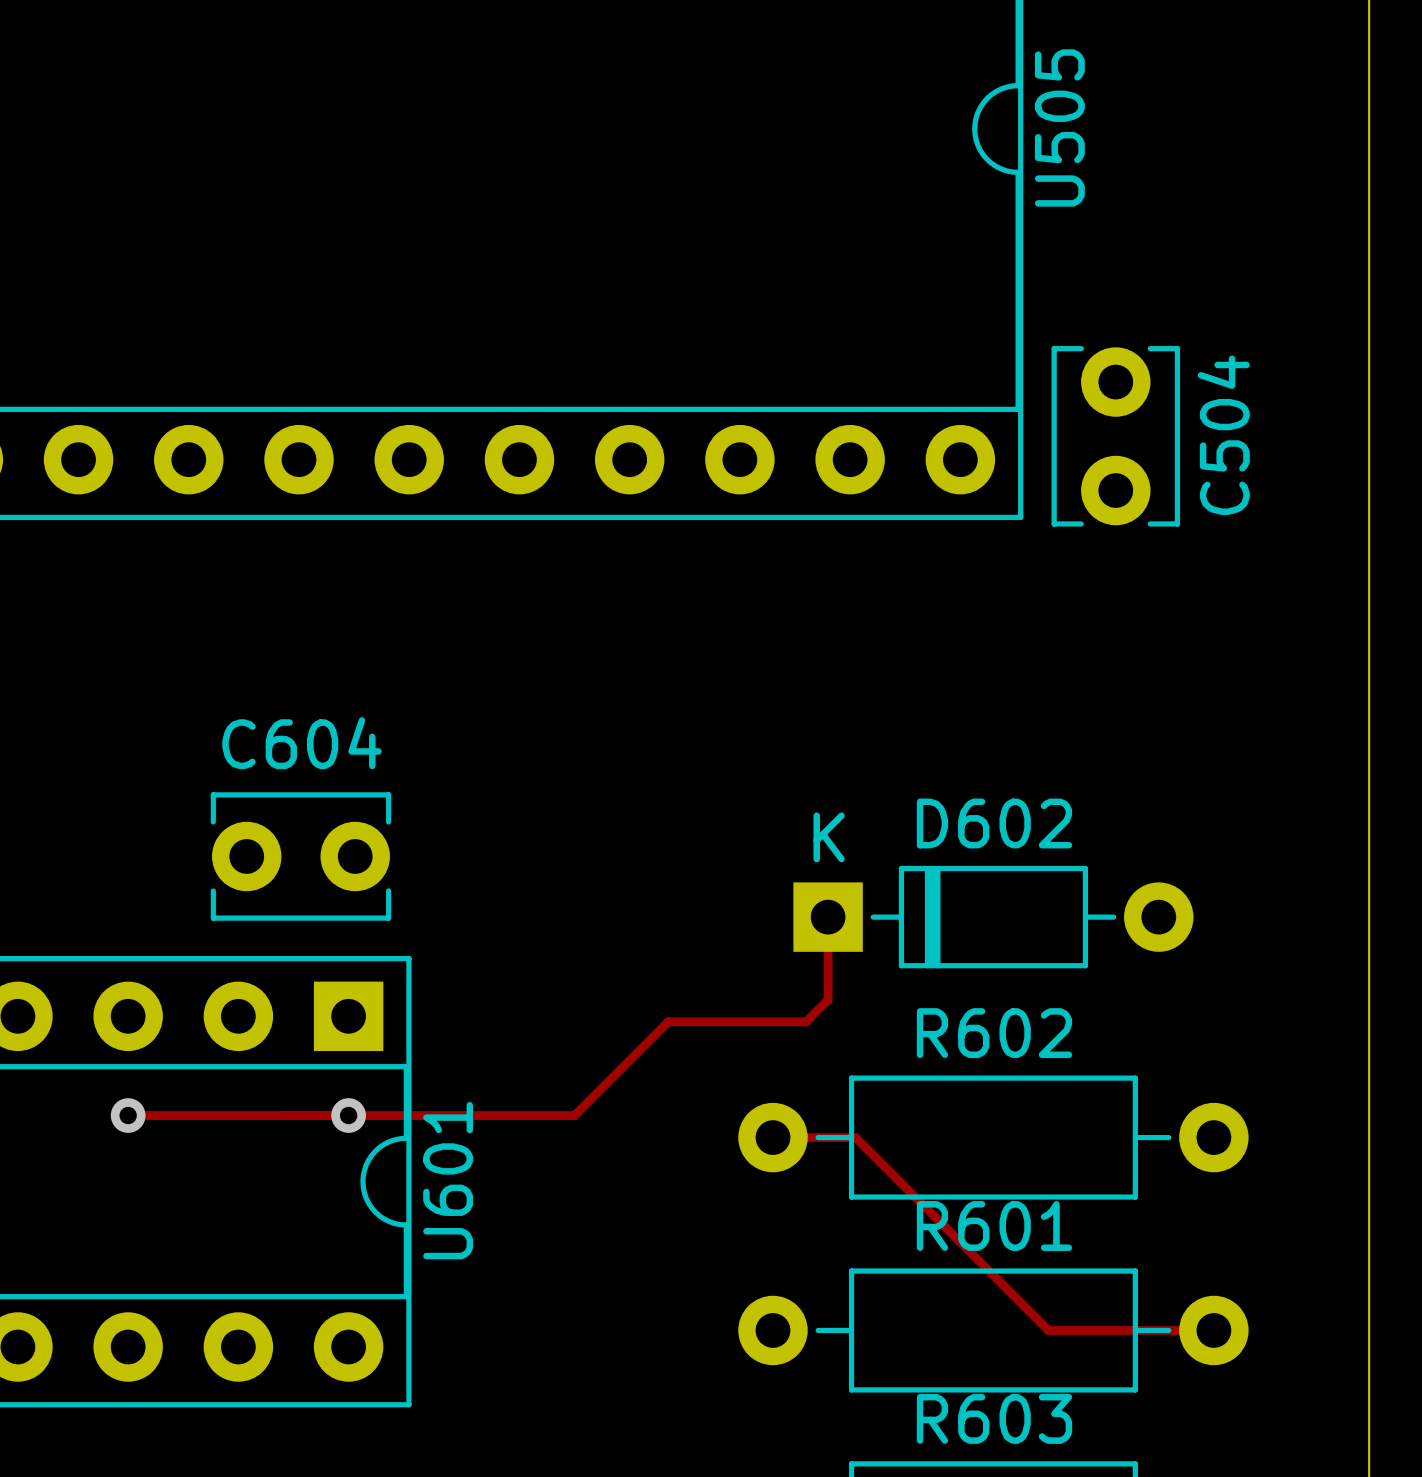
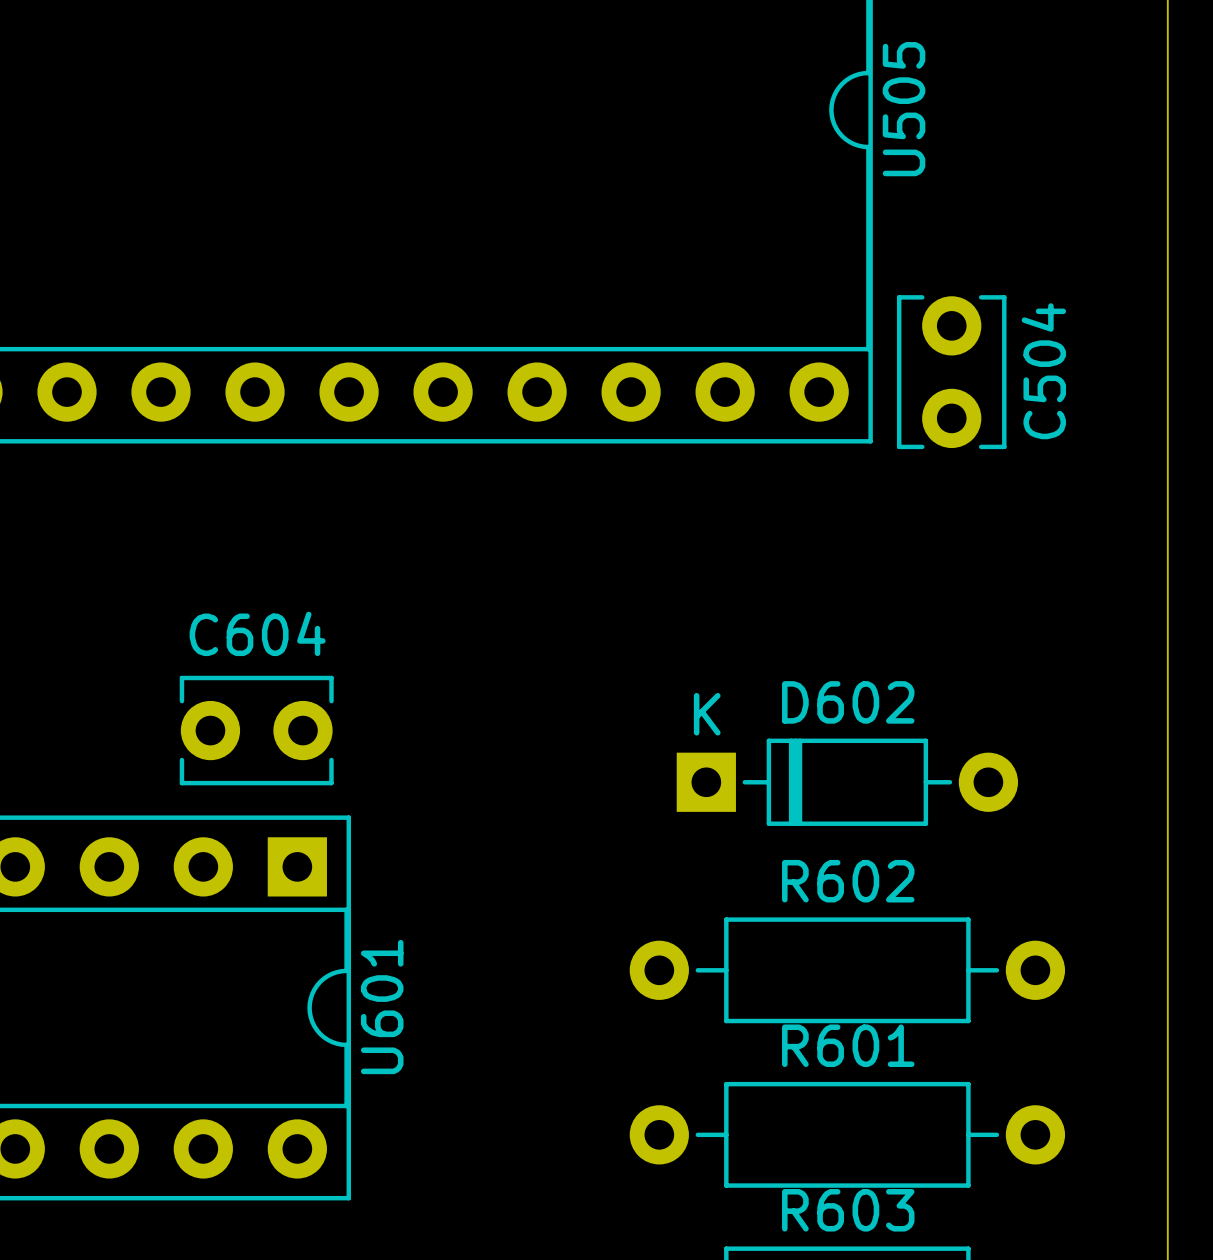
track: (828, 917) (828, 999) (806, 1021) (668, 1021) (574, 1115) (128, 1115) -> none
via: (128, 1115) -> none
via: (348, 1115) -> none
track: (772, 1137) (855, 1137) (1048, 1330) (1213, 1330) -> none

